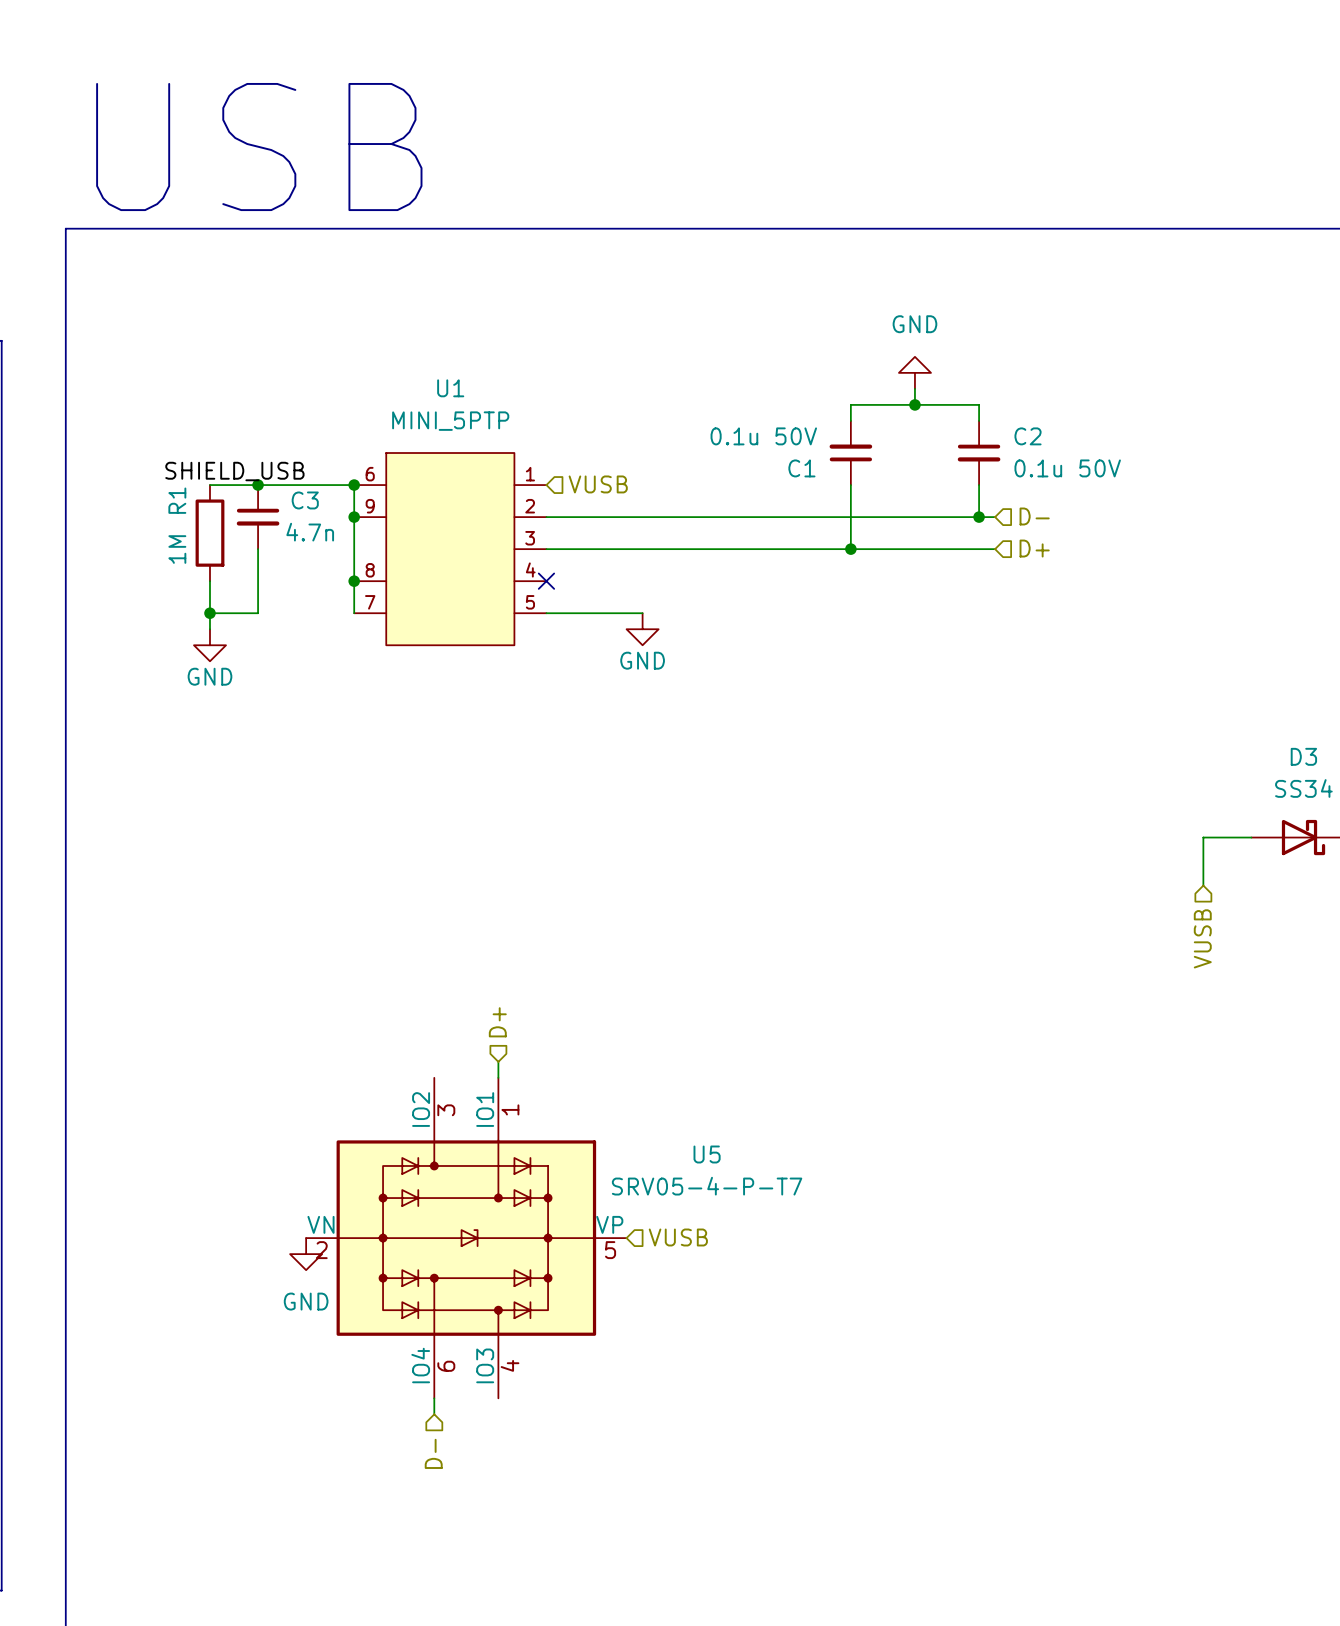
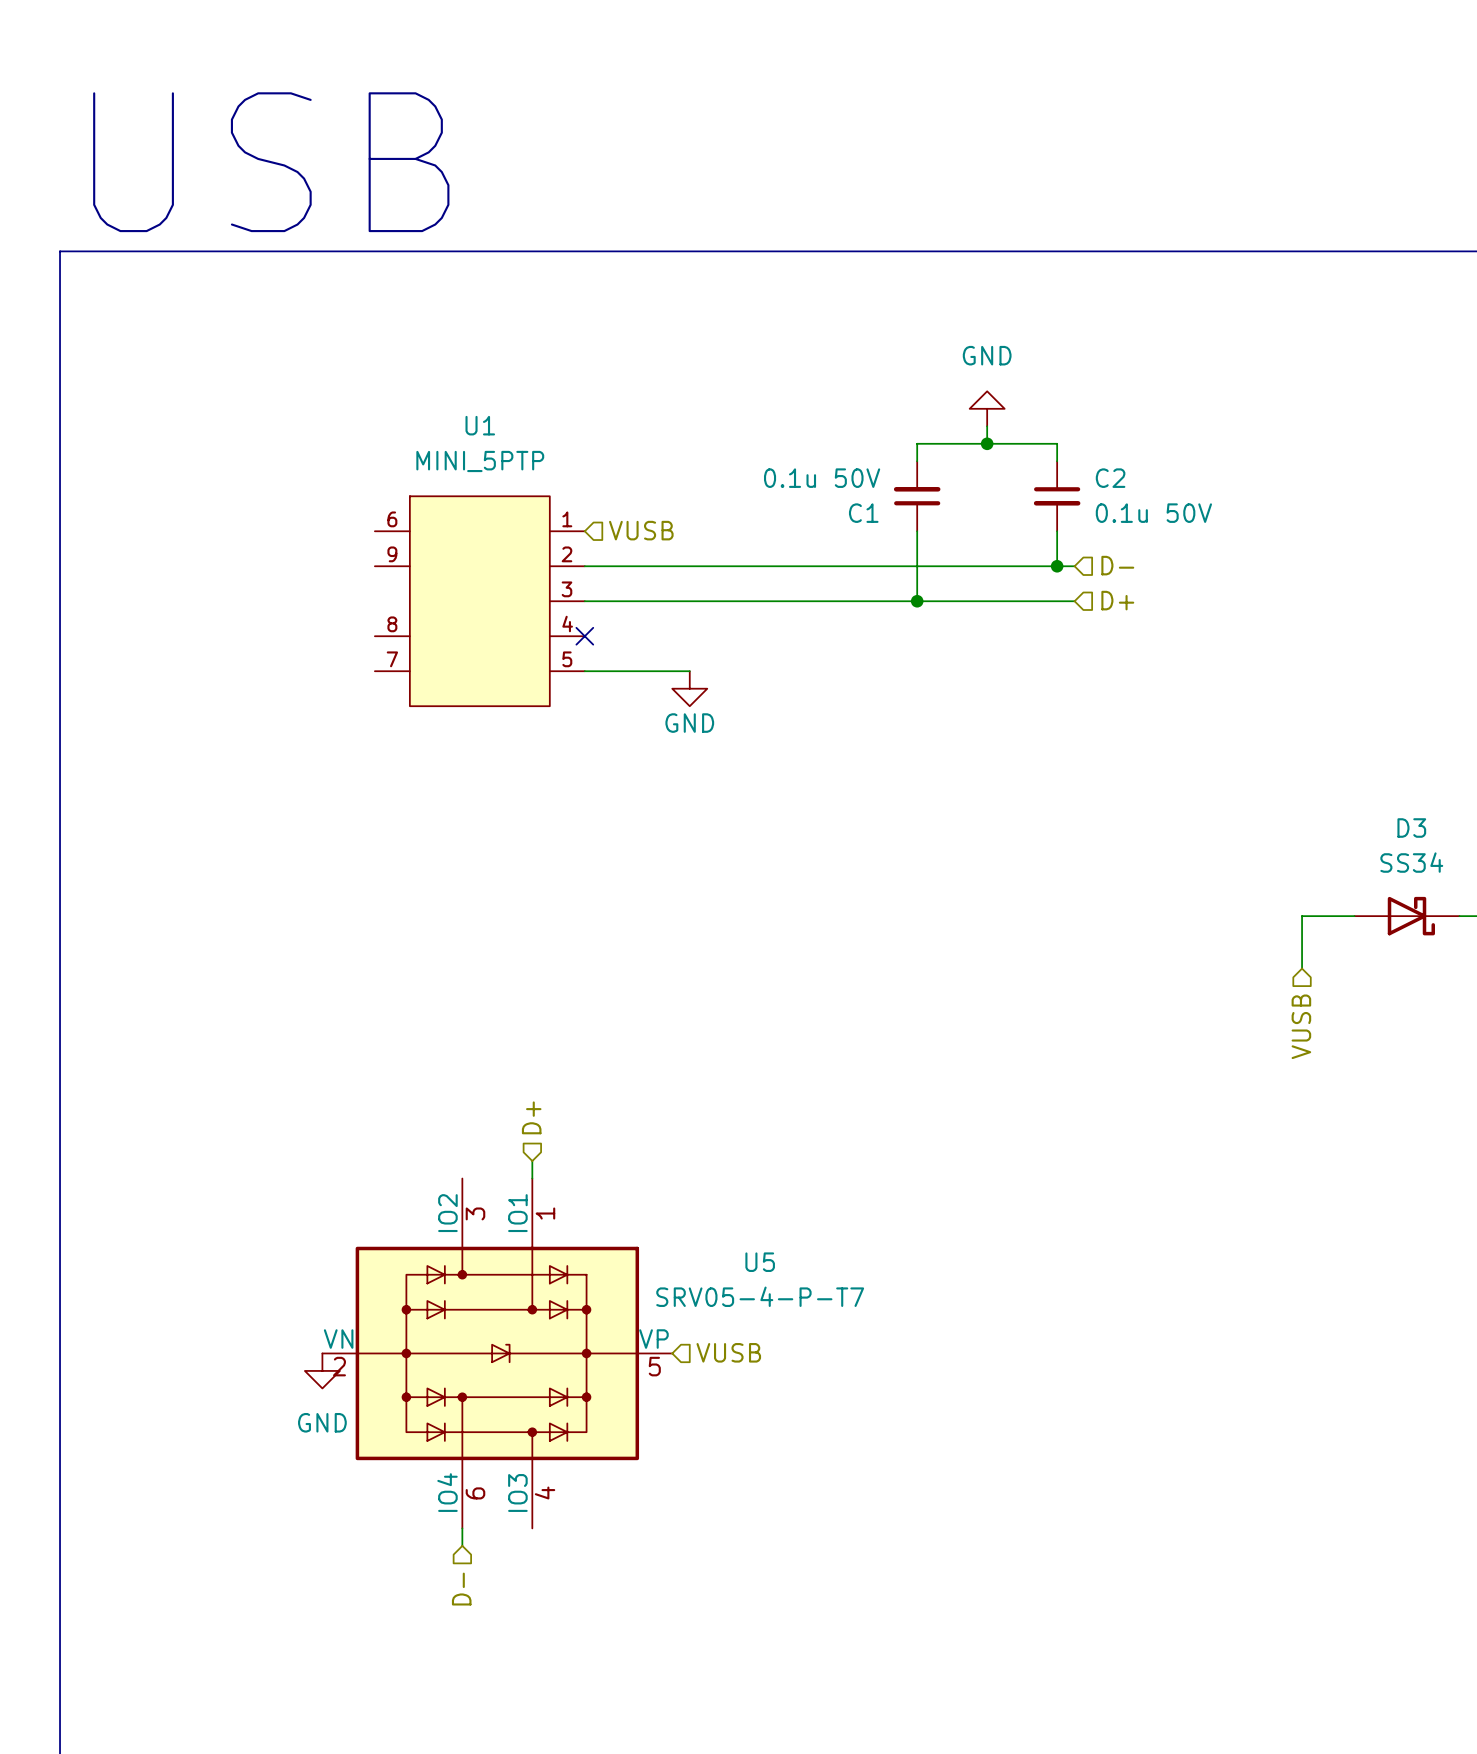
label: SHIELD_USB (234, 471) -> none
wire: (209, 485) (354, 485) (354, 613) -> none
junction: (258, 485) -> none
junction: (354, 485) -> none
C3: 4.7n (258, 517) -> none
junction: (354, 517) -> none
R1: 1M (209, 533) -> none
wire: (258, 549) (258, 613) (209, 613) -> none
wire: (209, 581) (209, 629) -> none
junction: (354, 581) -> none
junction: (209, 613) -> none
power symbol: GND (209, 645) -> none

